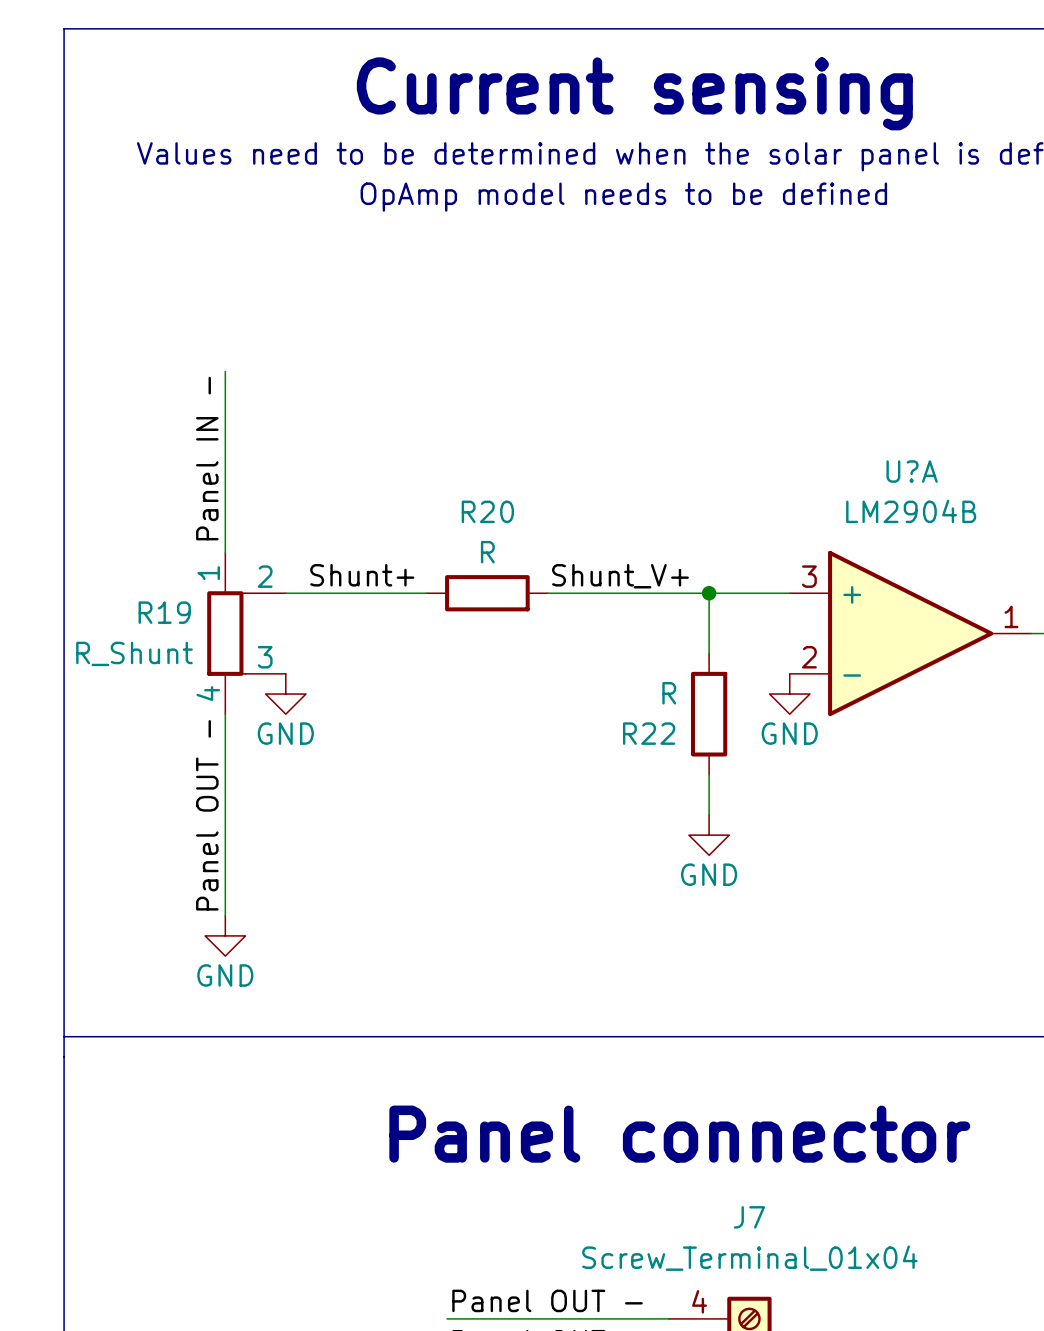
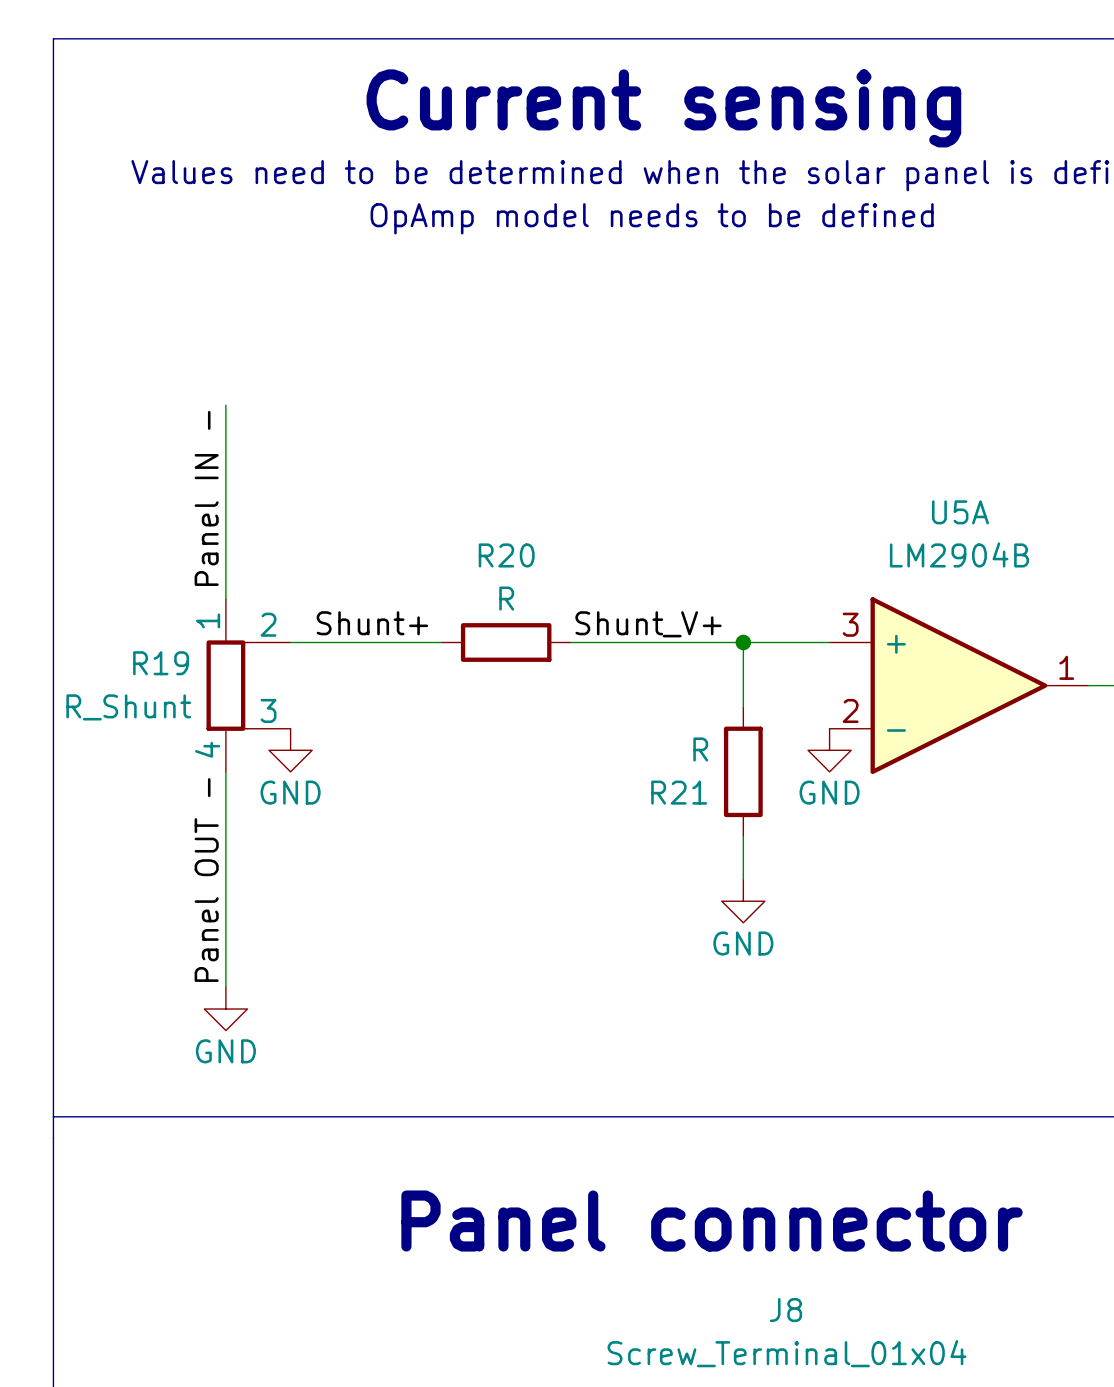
U?A name: U?A (912, 471) -> U5A (960, 512)
R22 name: R22 (649, 733) -> R21 (679, 792)
J7 name: J7 (749, 1217) -> J8 (785, 1310)

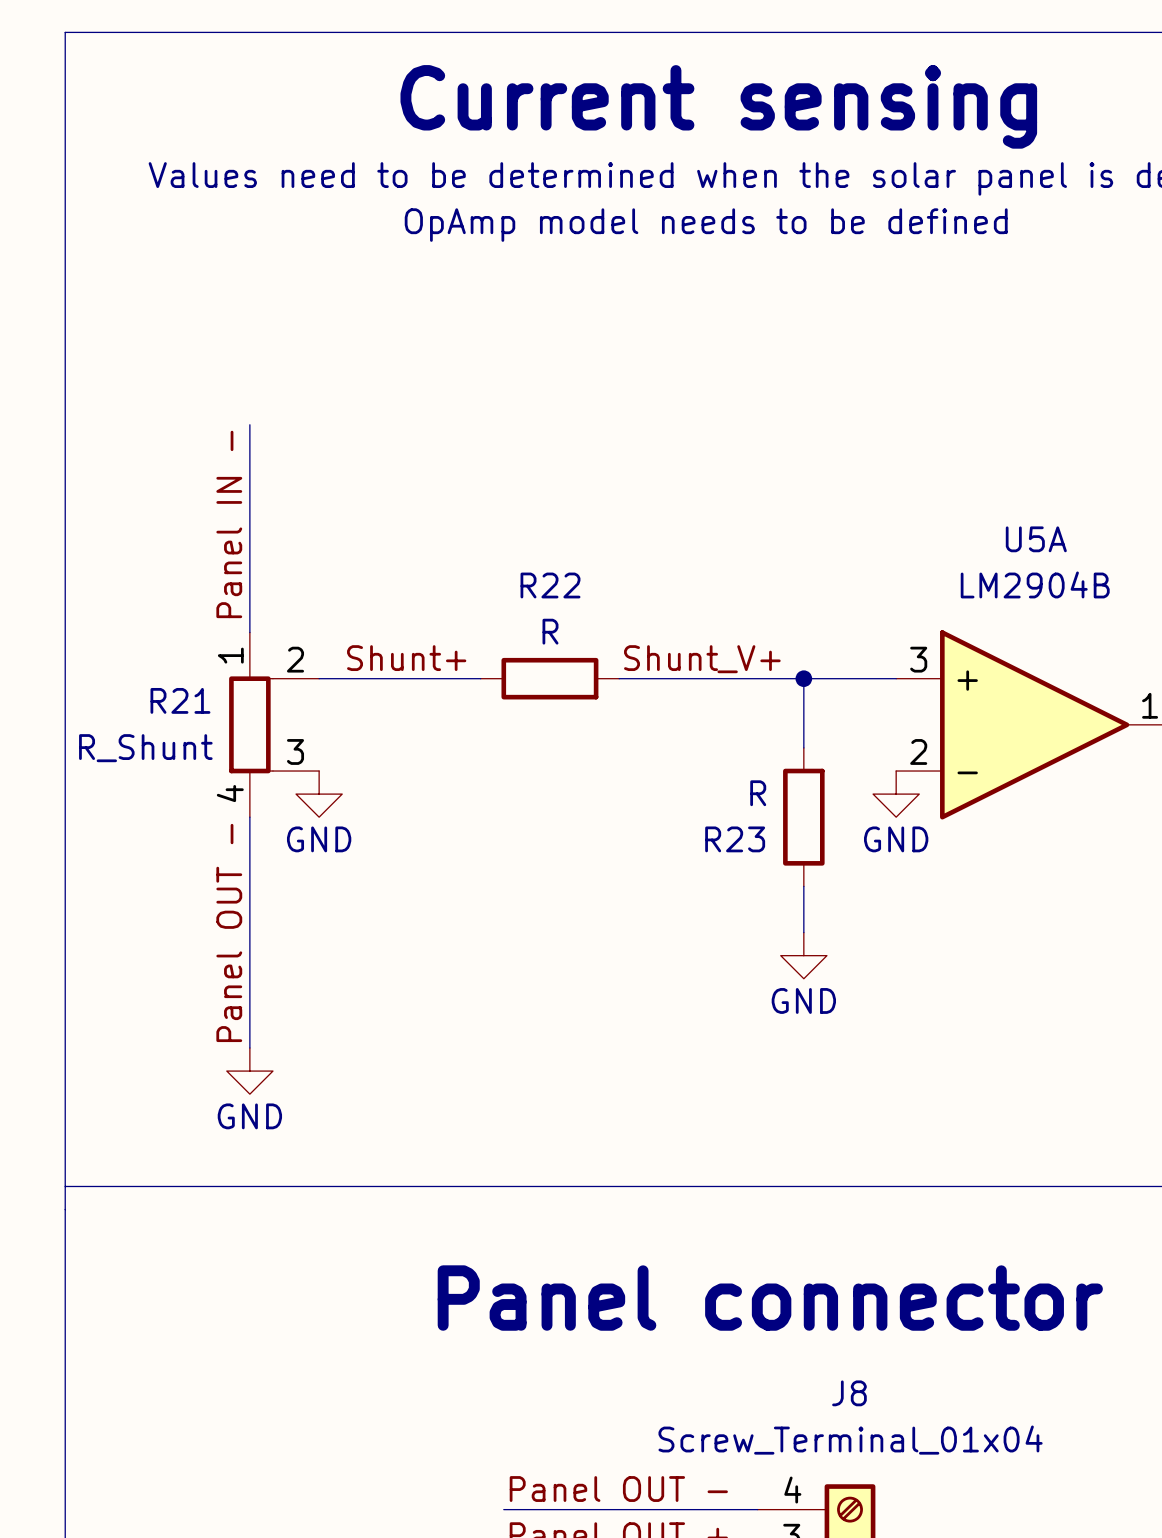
R20 name: R20 (506, 555) -> R22 (550, 585)
R19 name: R19 (161, 663) -> R21 (180, 700)
R21 name: R21 (679, 792) -> R23 (735, 839)

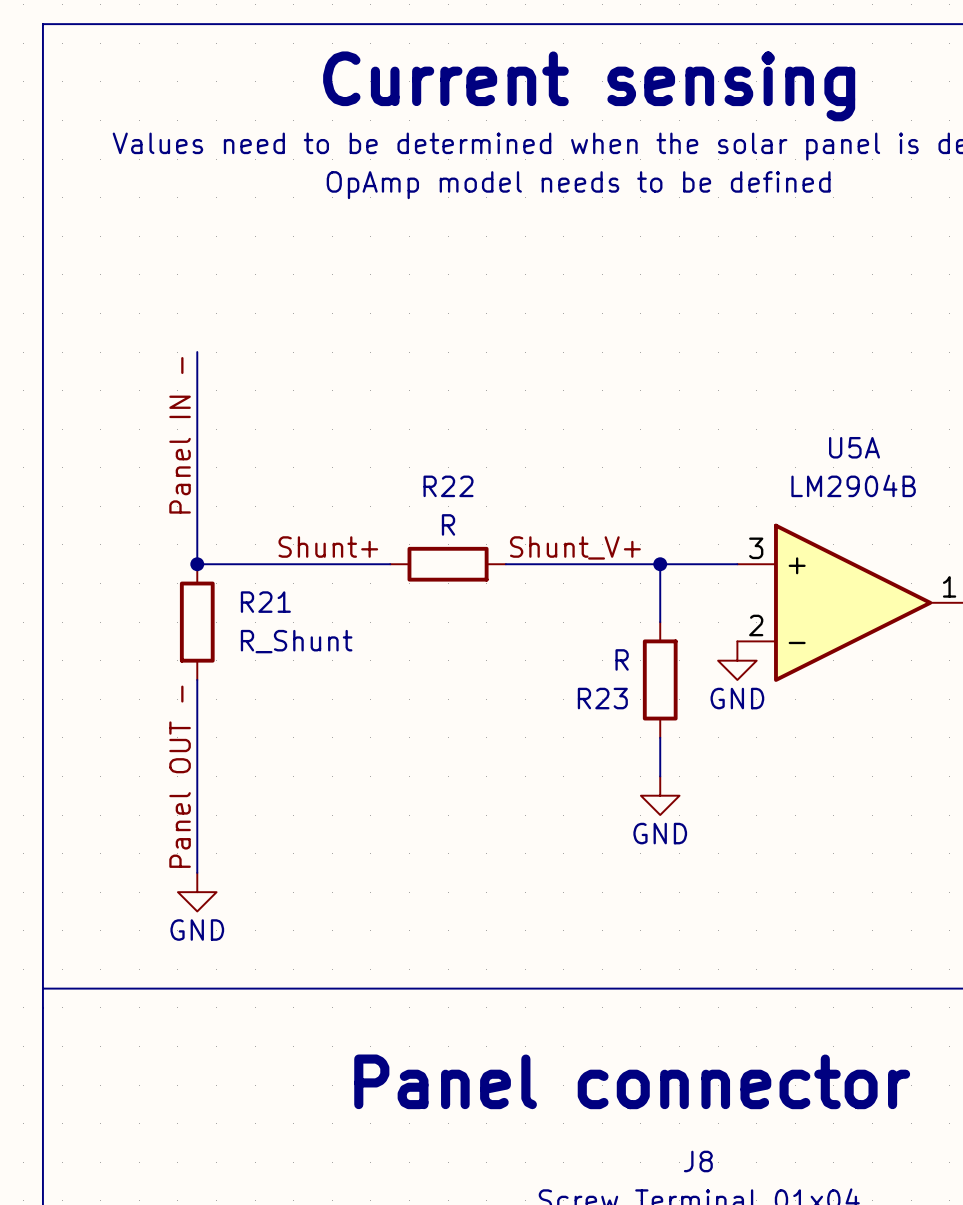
R21 symbol: [229, 632, 320, 818] -> [179, 564, 215, 680]
junction: none -> (197, 564)
R21 name position: R21 (180, 700) -> R21 (265, 602)
R21 value position: R_Shunt (145, 748) -> R_Shunt (296, 641)
power symbol: GND (319, 794) -> none

